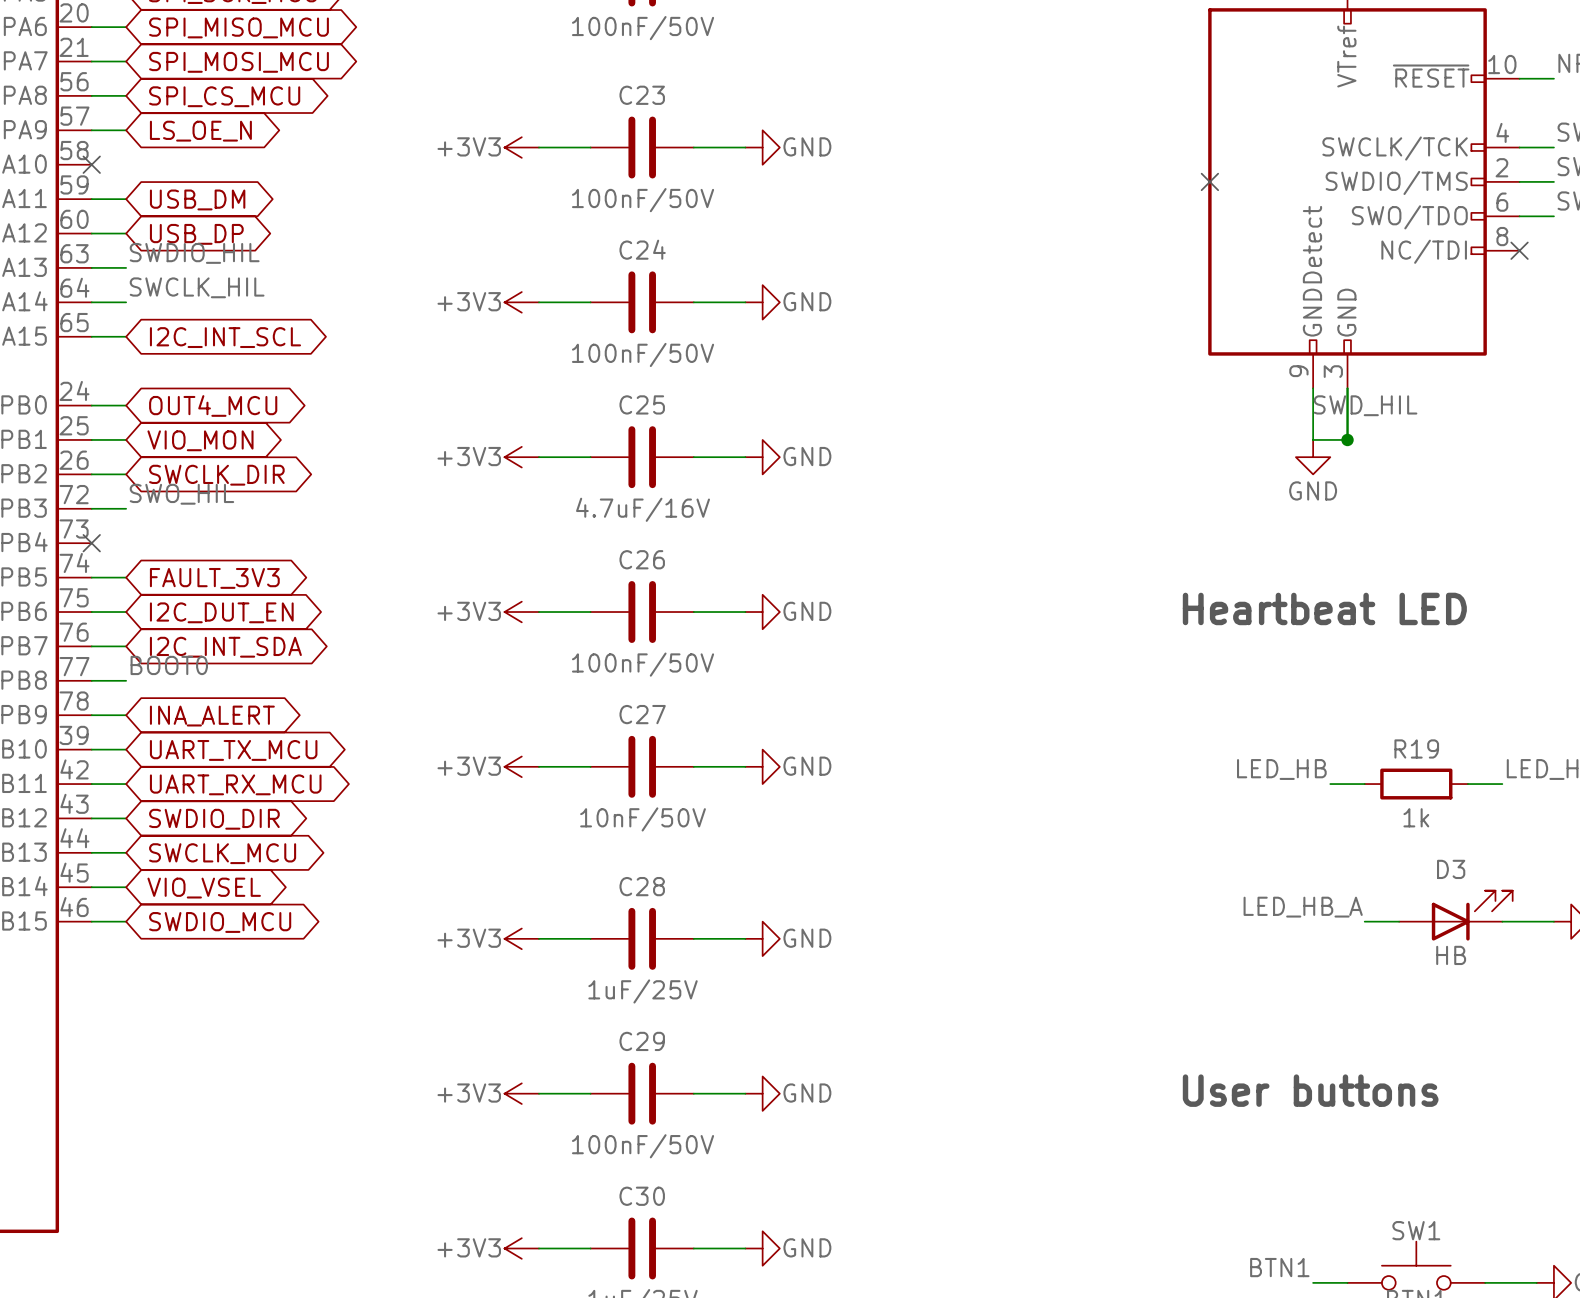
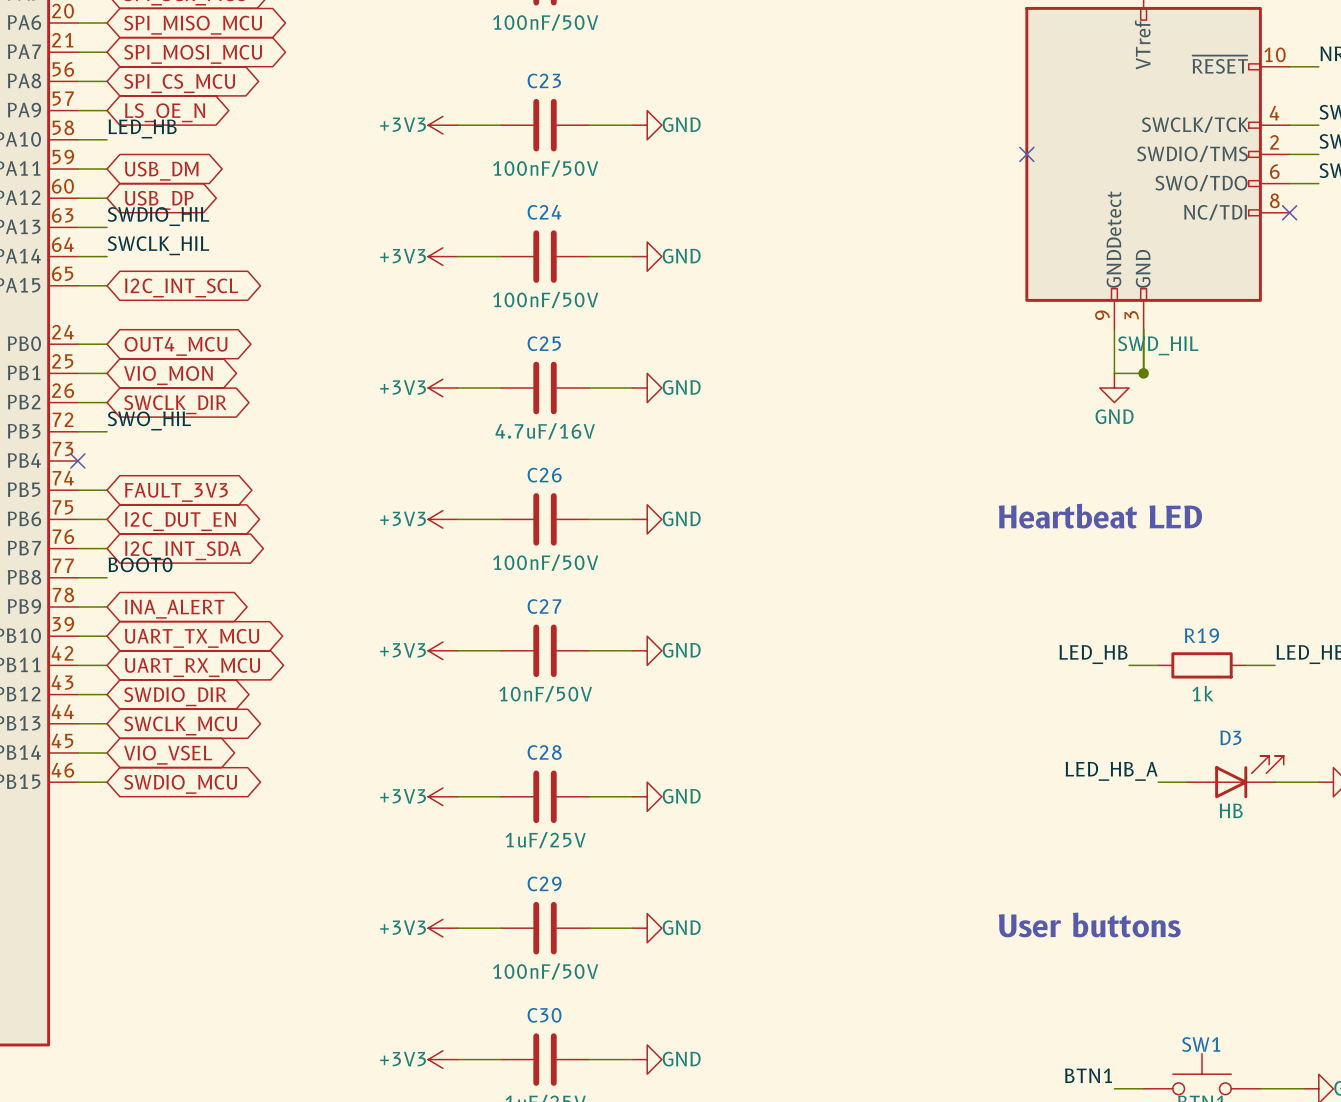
label: none -> LED_HB (142, 128)
wire: none -> (77, 139) (107, 139)
no-connect mark: (91, 164) -> none

